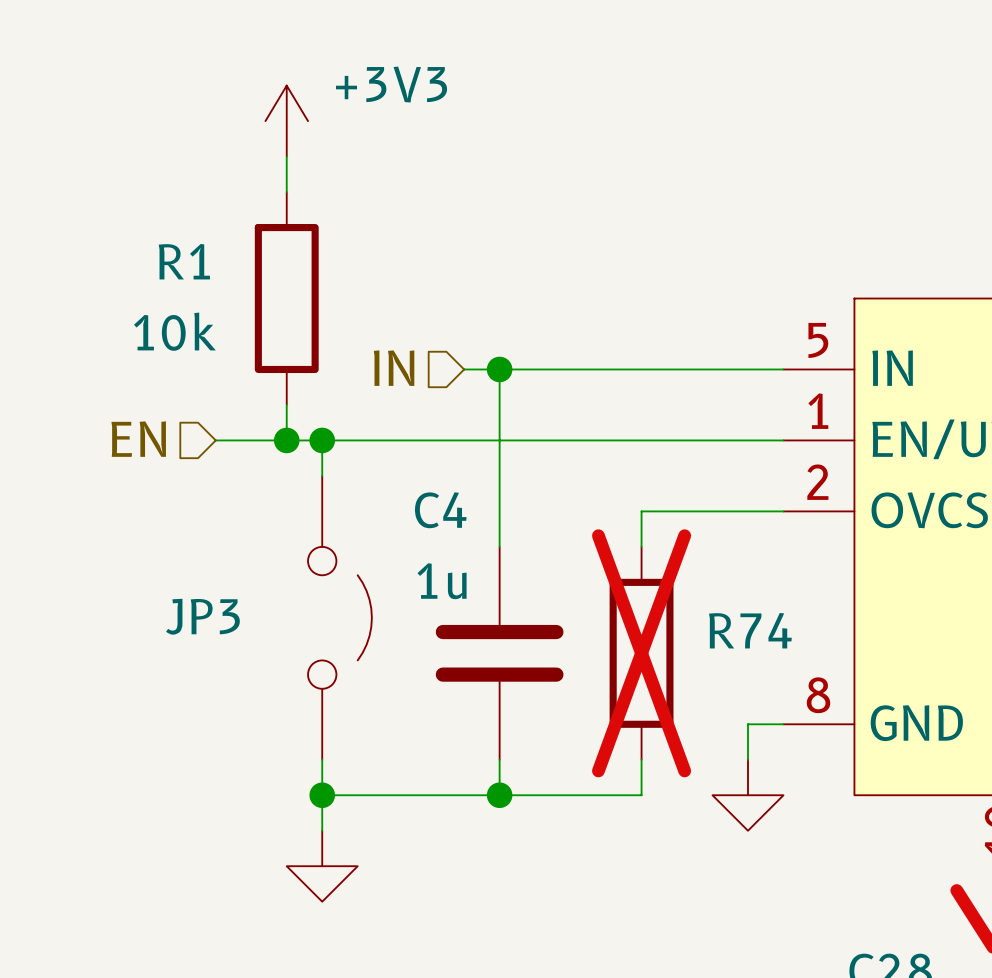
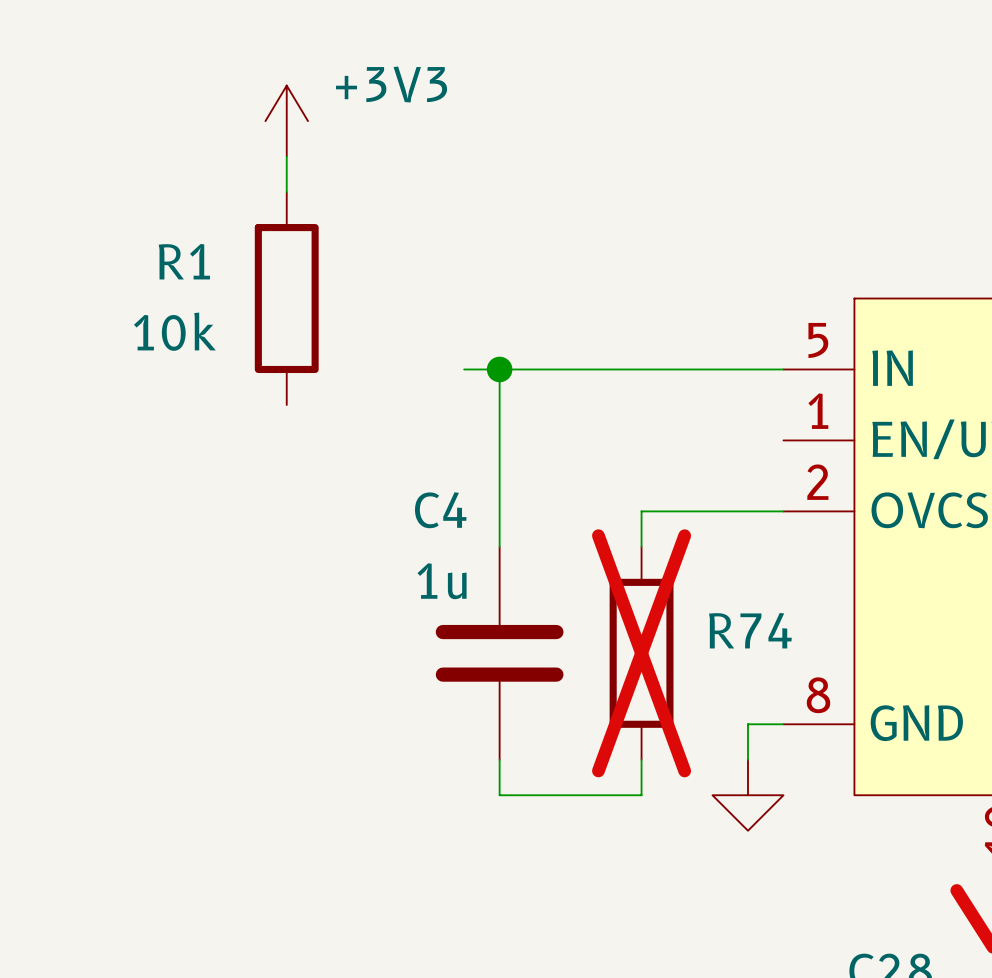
hierarchical label: IN (394, 368) -> none
wire: (286, 404) (286, 440) -> none
hierarchical label: EN (138, 439) -> none
wire: (215, 440) (783, 440) -> none
junction: (286, 440) -> none
wire: (322, 440) (322, 475) -> none
junction: (322, 440) -> none
JP3: (339, 617) -> none
wire: (322, 759) (322, 830) -> none
wire: (322, 795) (499, 795) -> none
junction: (322, 795) -> none
junction: (499, 795) -> none
power symbol: (322, 866) -> none

